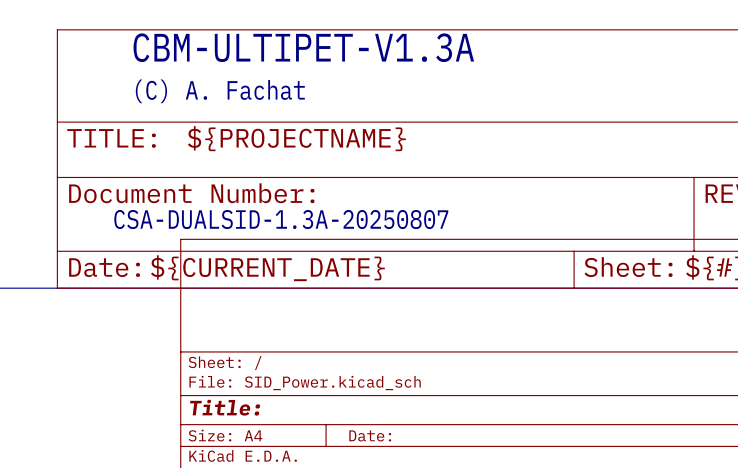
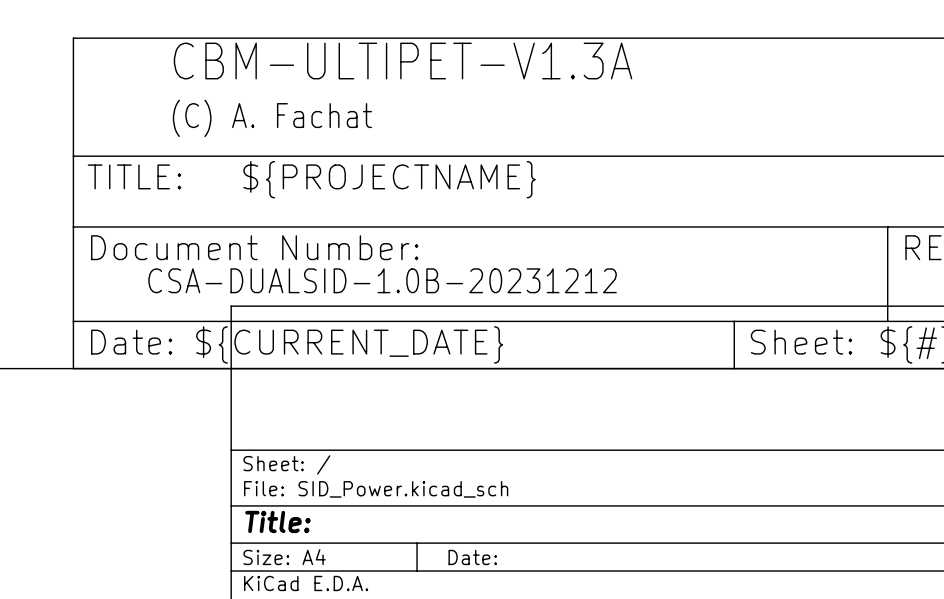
text: CSA-DUALSID-1.3A-20250807 (281, 219) -> CSA-DUALSID-1.0B-20231212 (382, 280)

